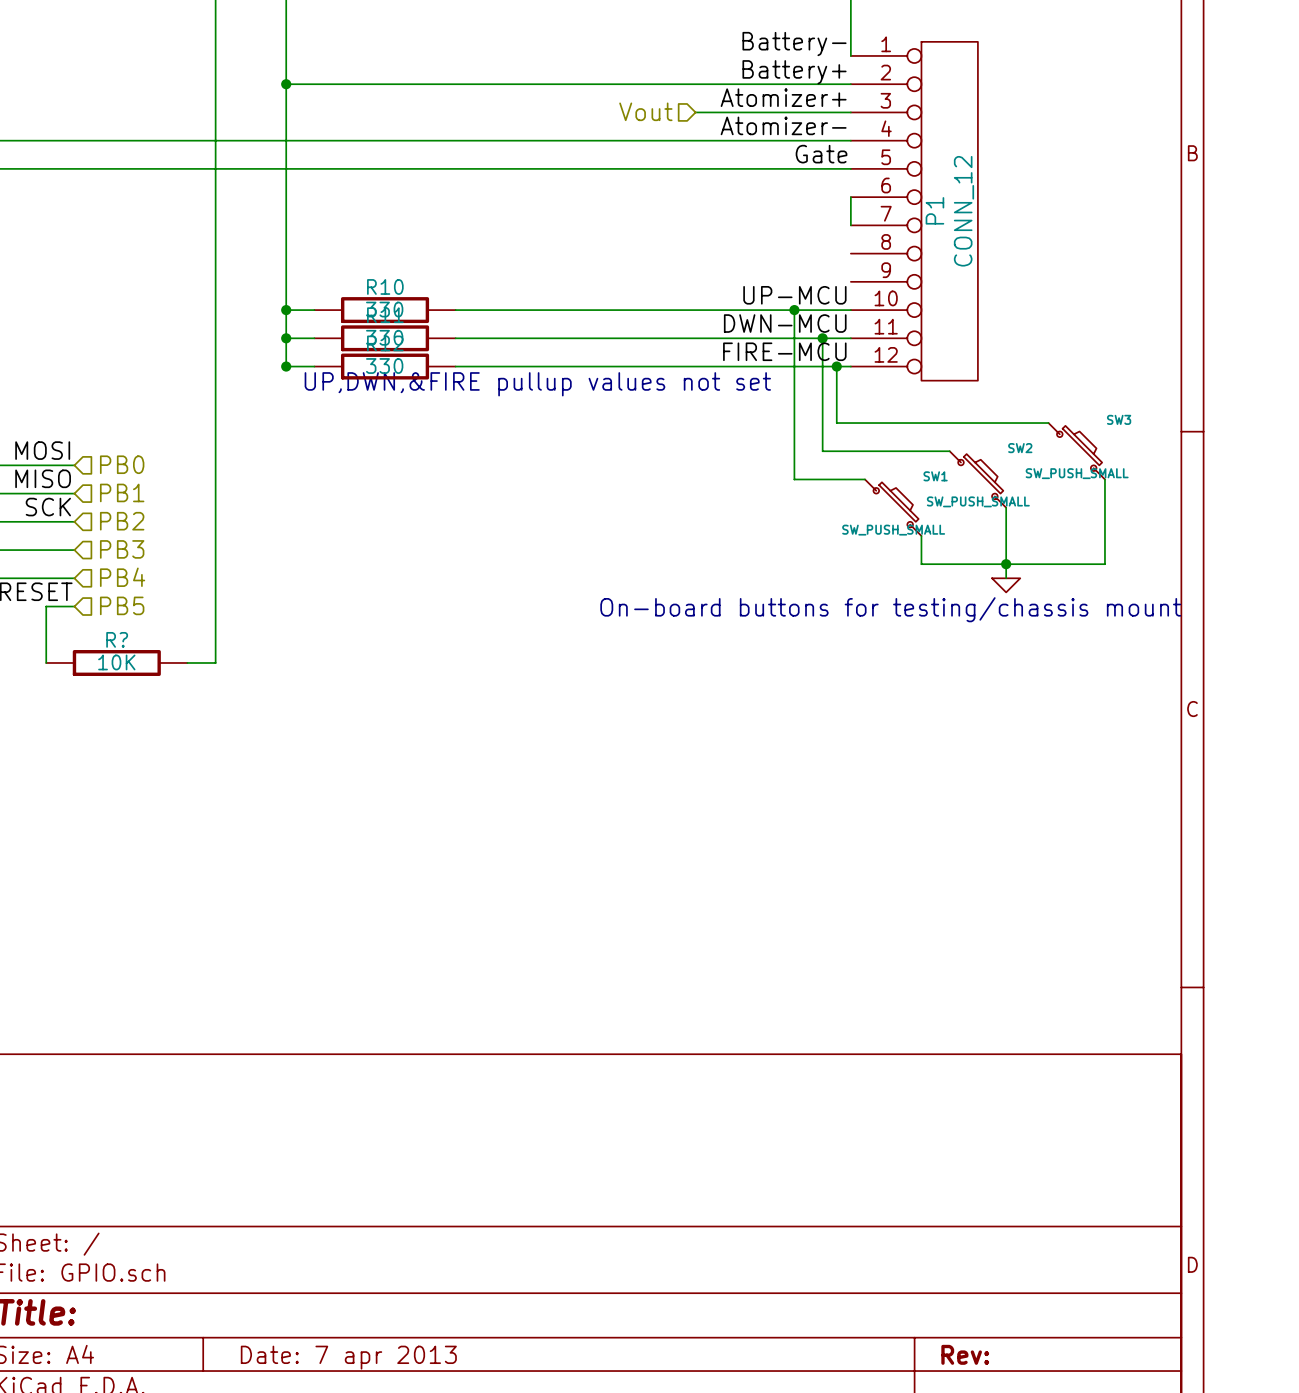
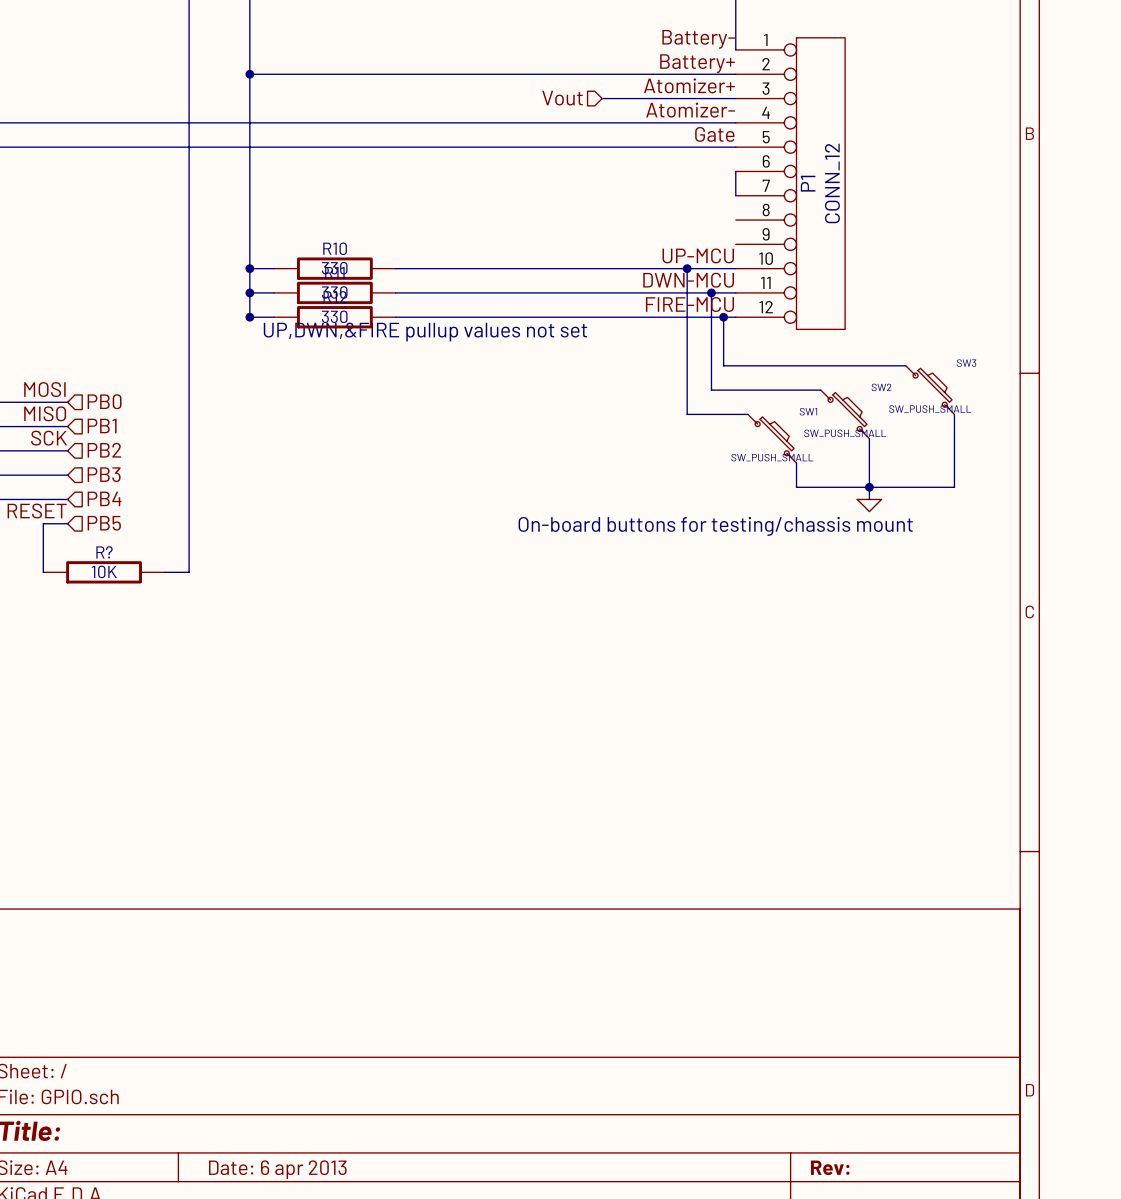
title block: Date: 7 apr 2013 (348, 1357) -> Date: 6 apr 2013 (277, 1169)

